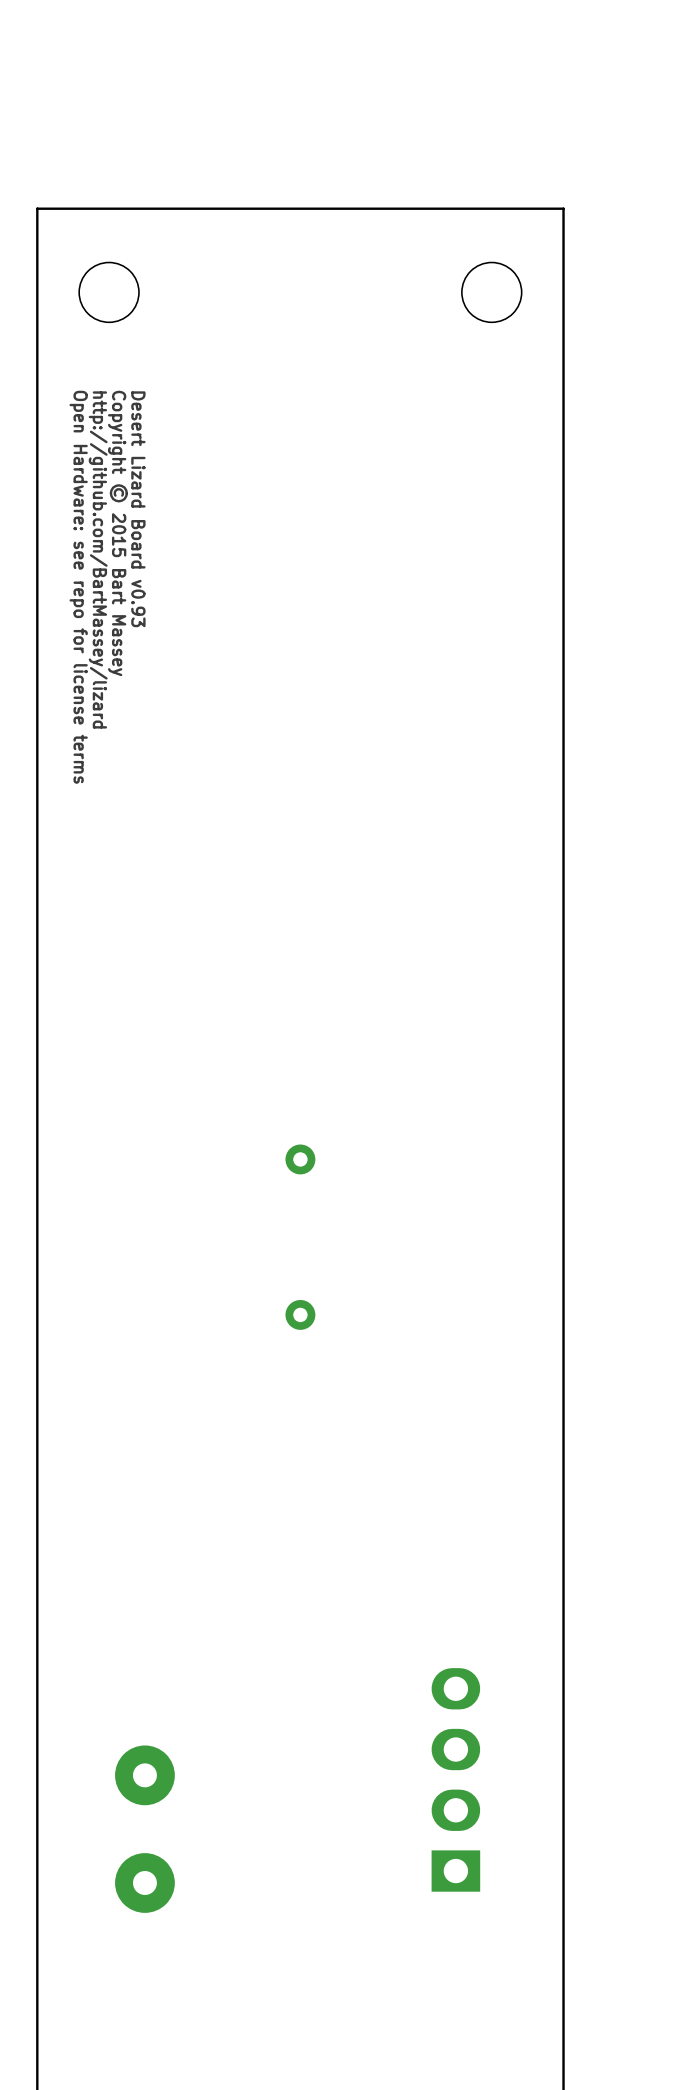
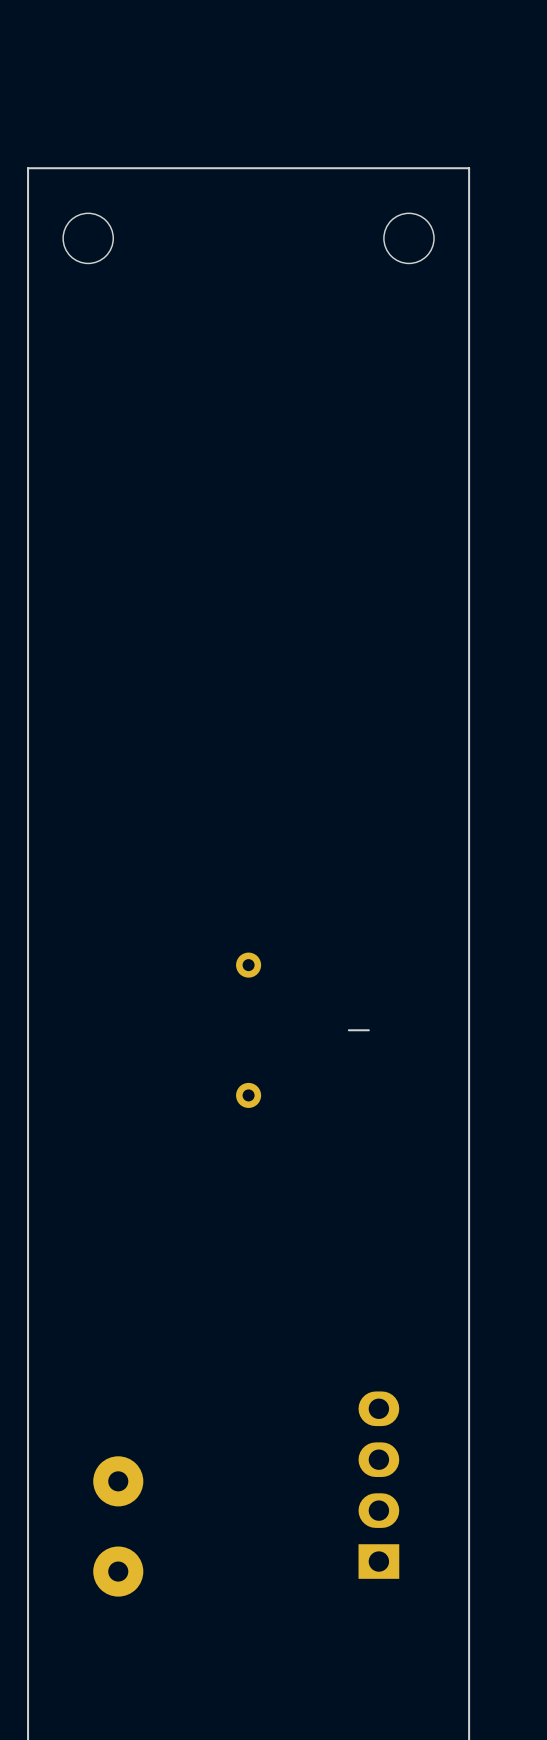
text: Desert Lizard Board v0.93 (138, 509) -> none
text: Copyright © 2015 Bart Massey (118, 533) -> none
text: http://github.com/BartMassey/lizard (98, 559) -> none
text: Open Hardware: see repo for license terms (78, 587) -> none
board edge: none -> (368, 1030) (348, 1030)

